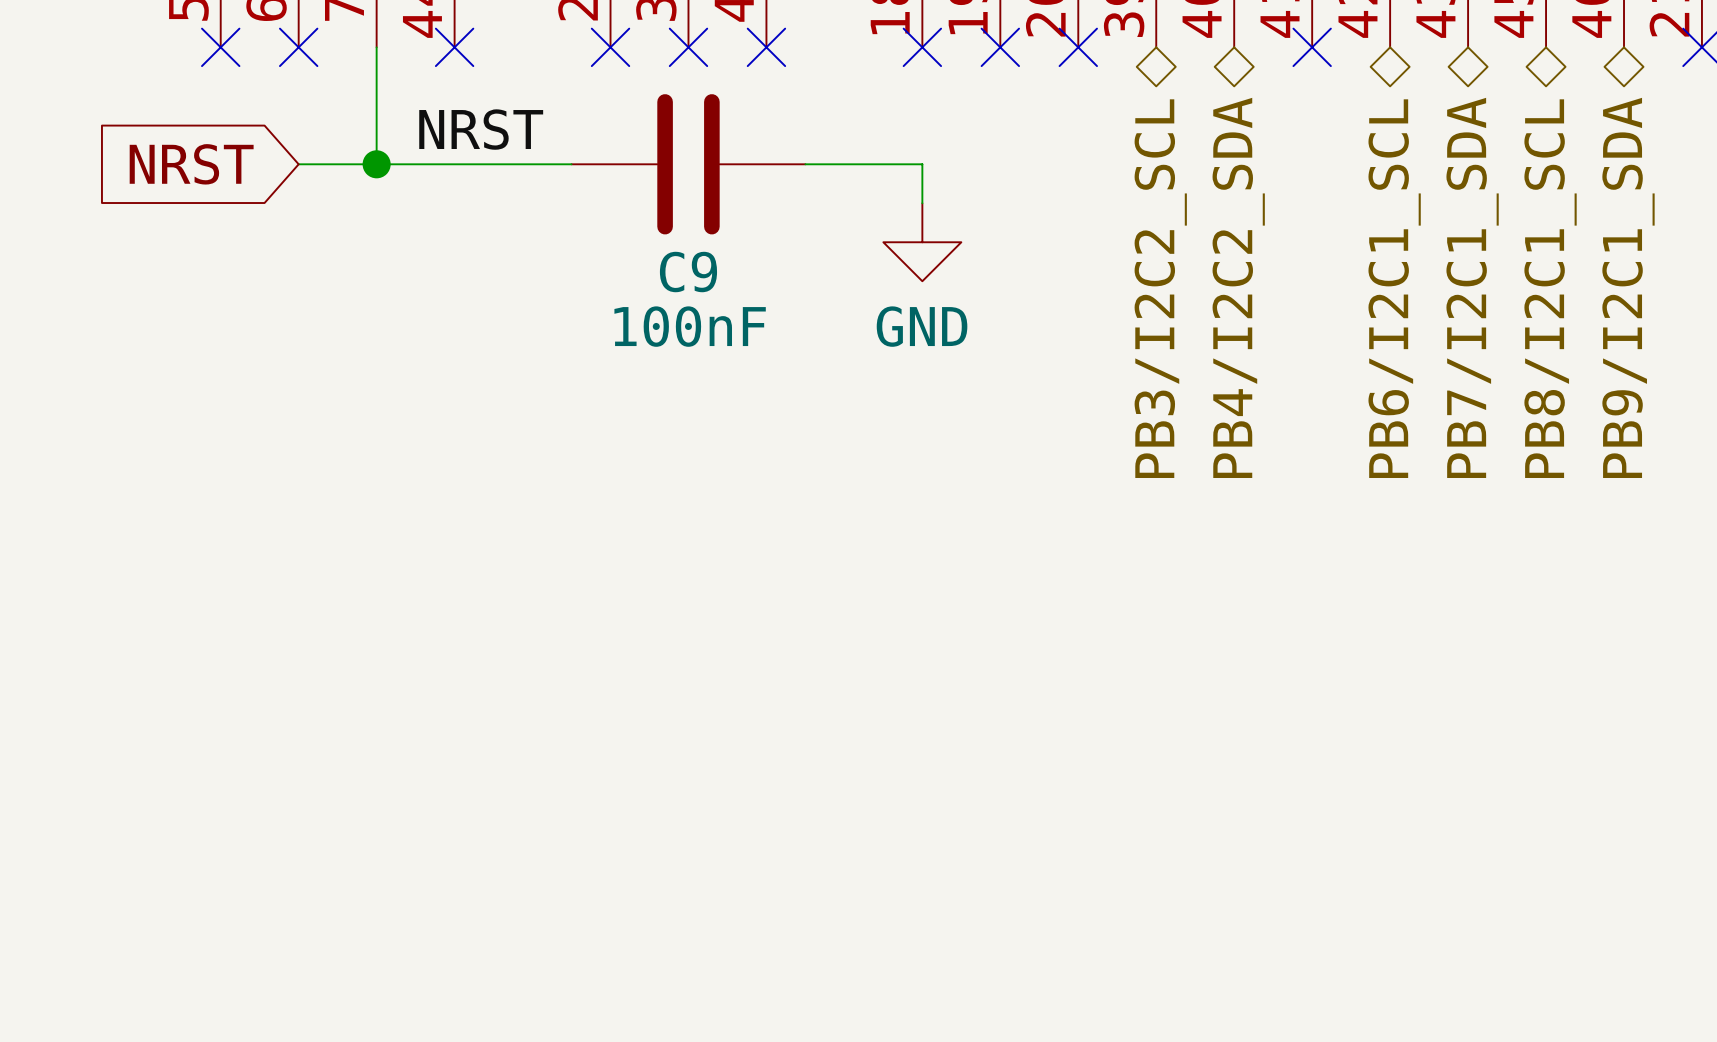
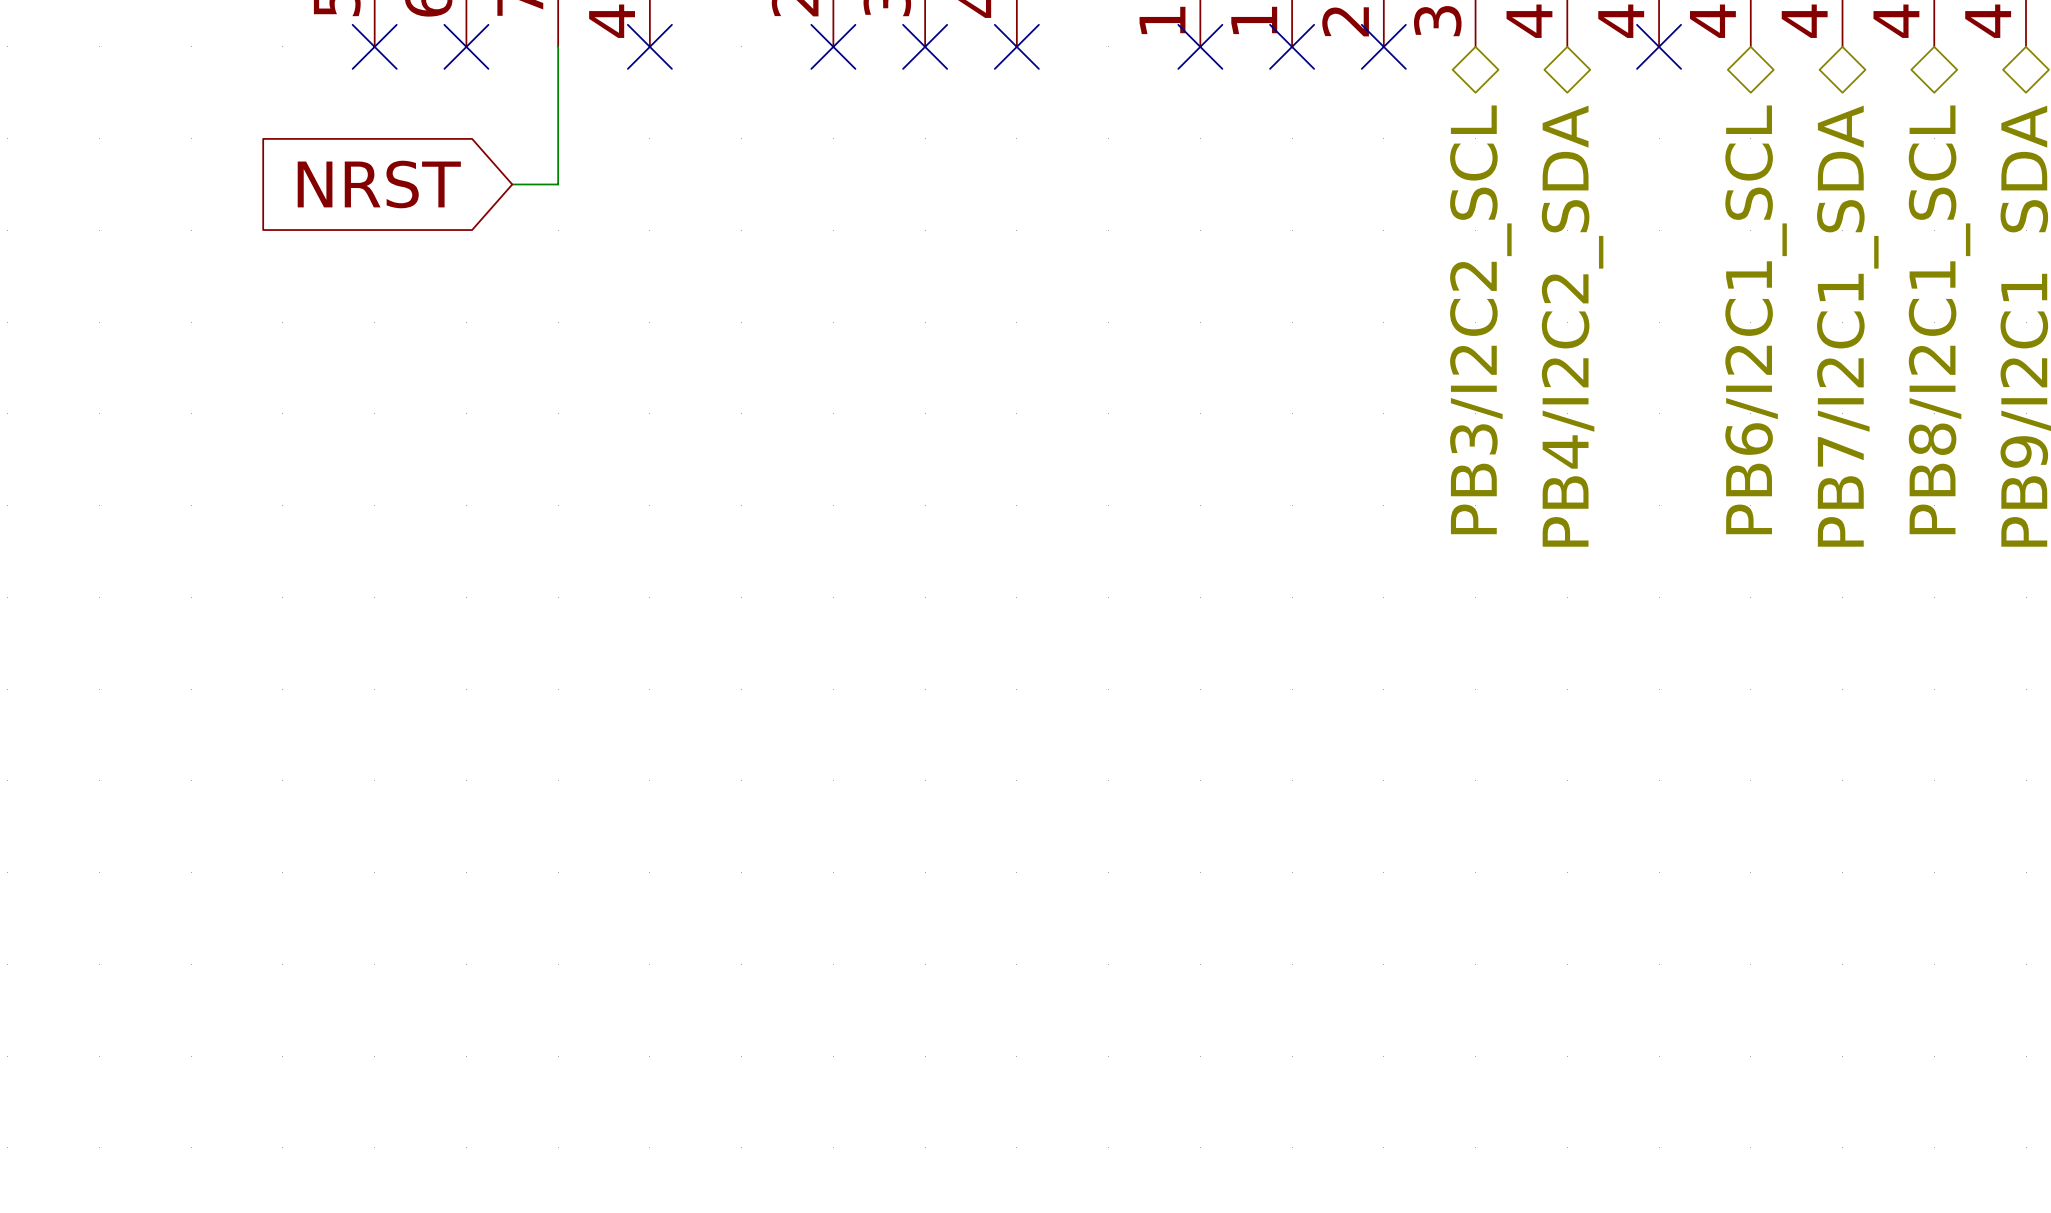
label: NRST (481, 129) -> none
global label position: NRST (191, 164) -> NRST (379, 184)
wire: (298, 164) (337, 164) -> none
wire: (376, 164) (571, 164) -> none
junction: (376, 164) -> none
C9: 100nF (688, 164) -> none
wire: (805, 164) (922, 164) (922, 203) -> none
power symbol: GND (922, 242) -> none

